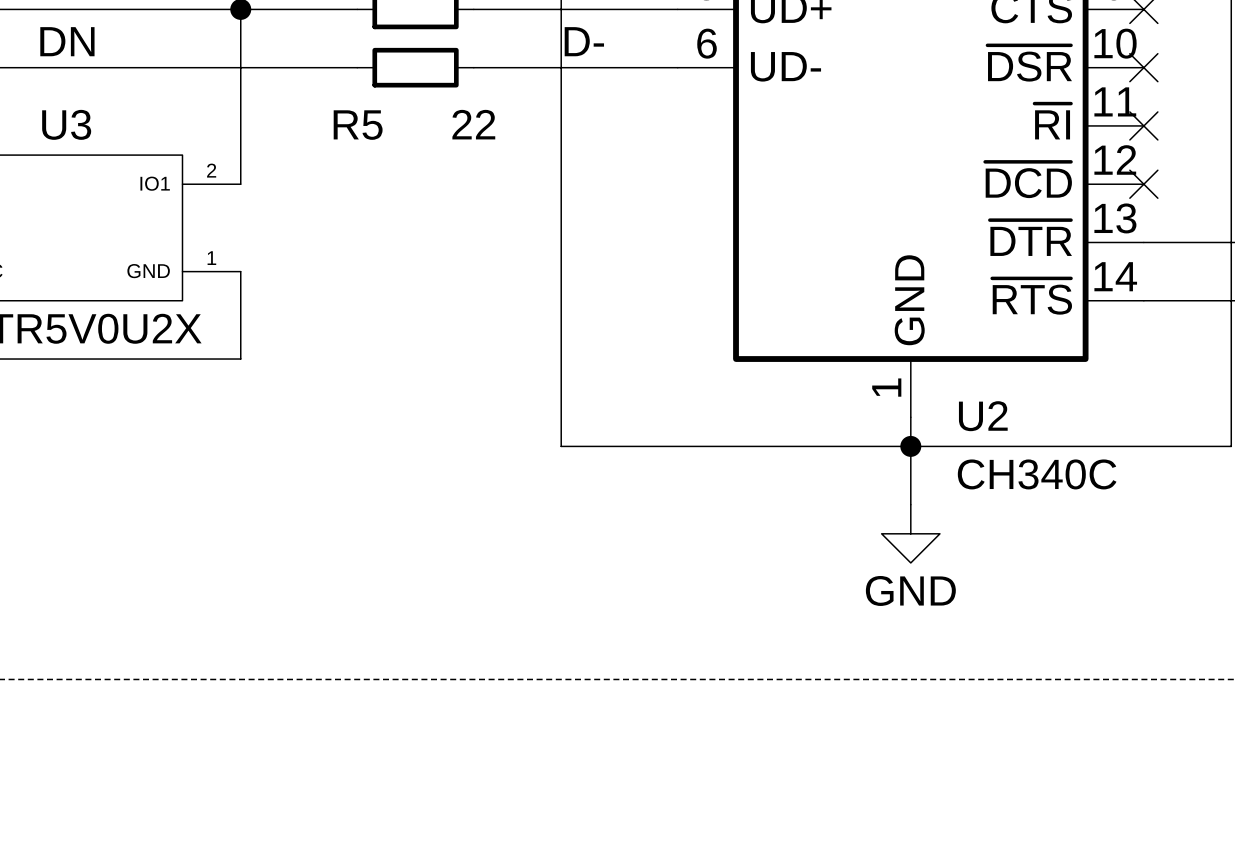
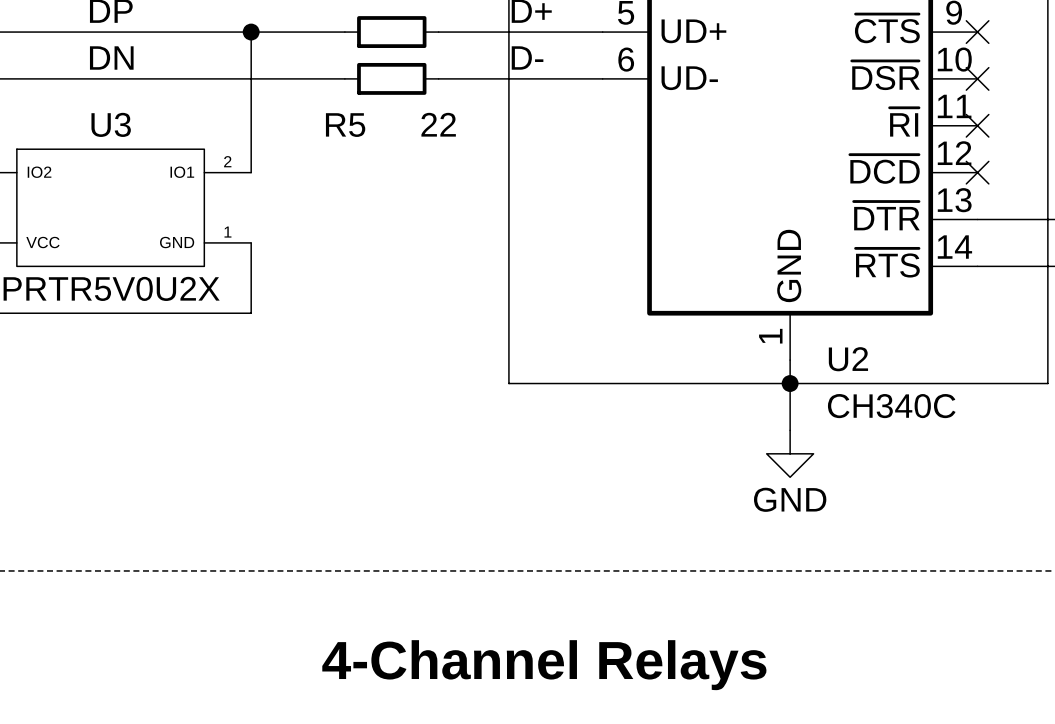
text: none -> 4-Channel Relays (544, 665)

